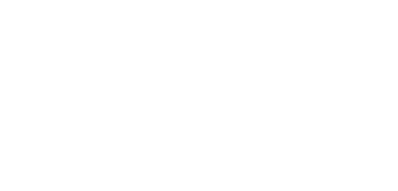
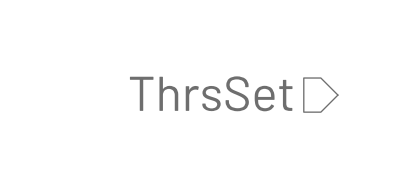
hierarchical label: none -> ThrsSet (211, 93)

